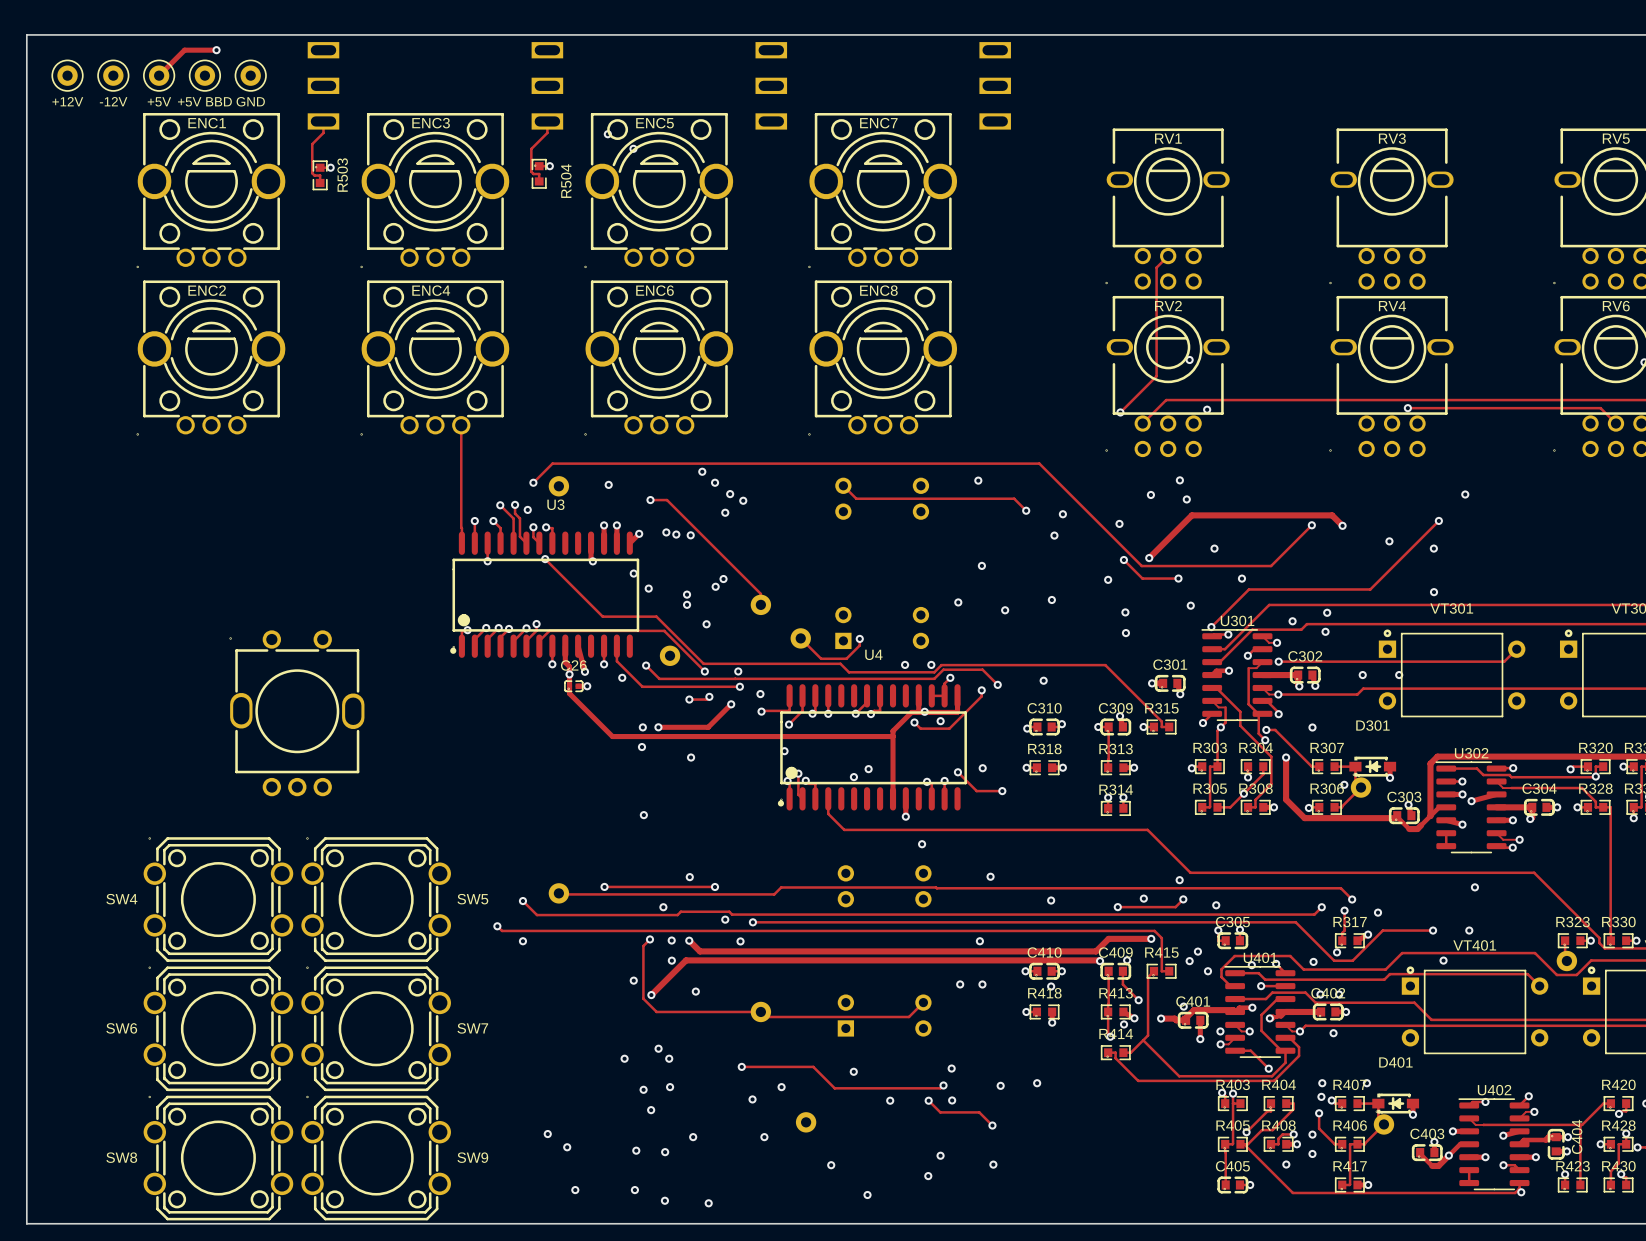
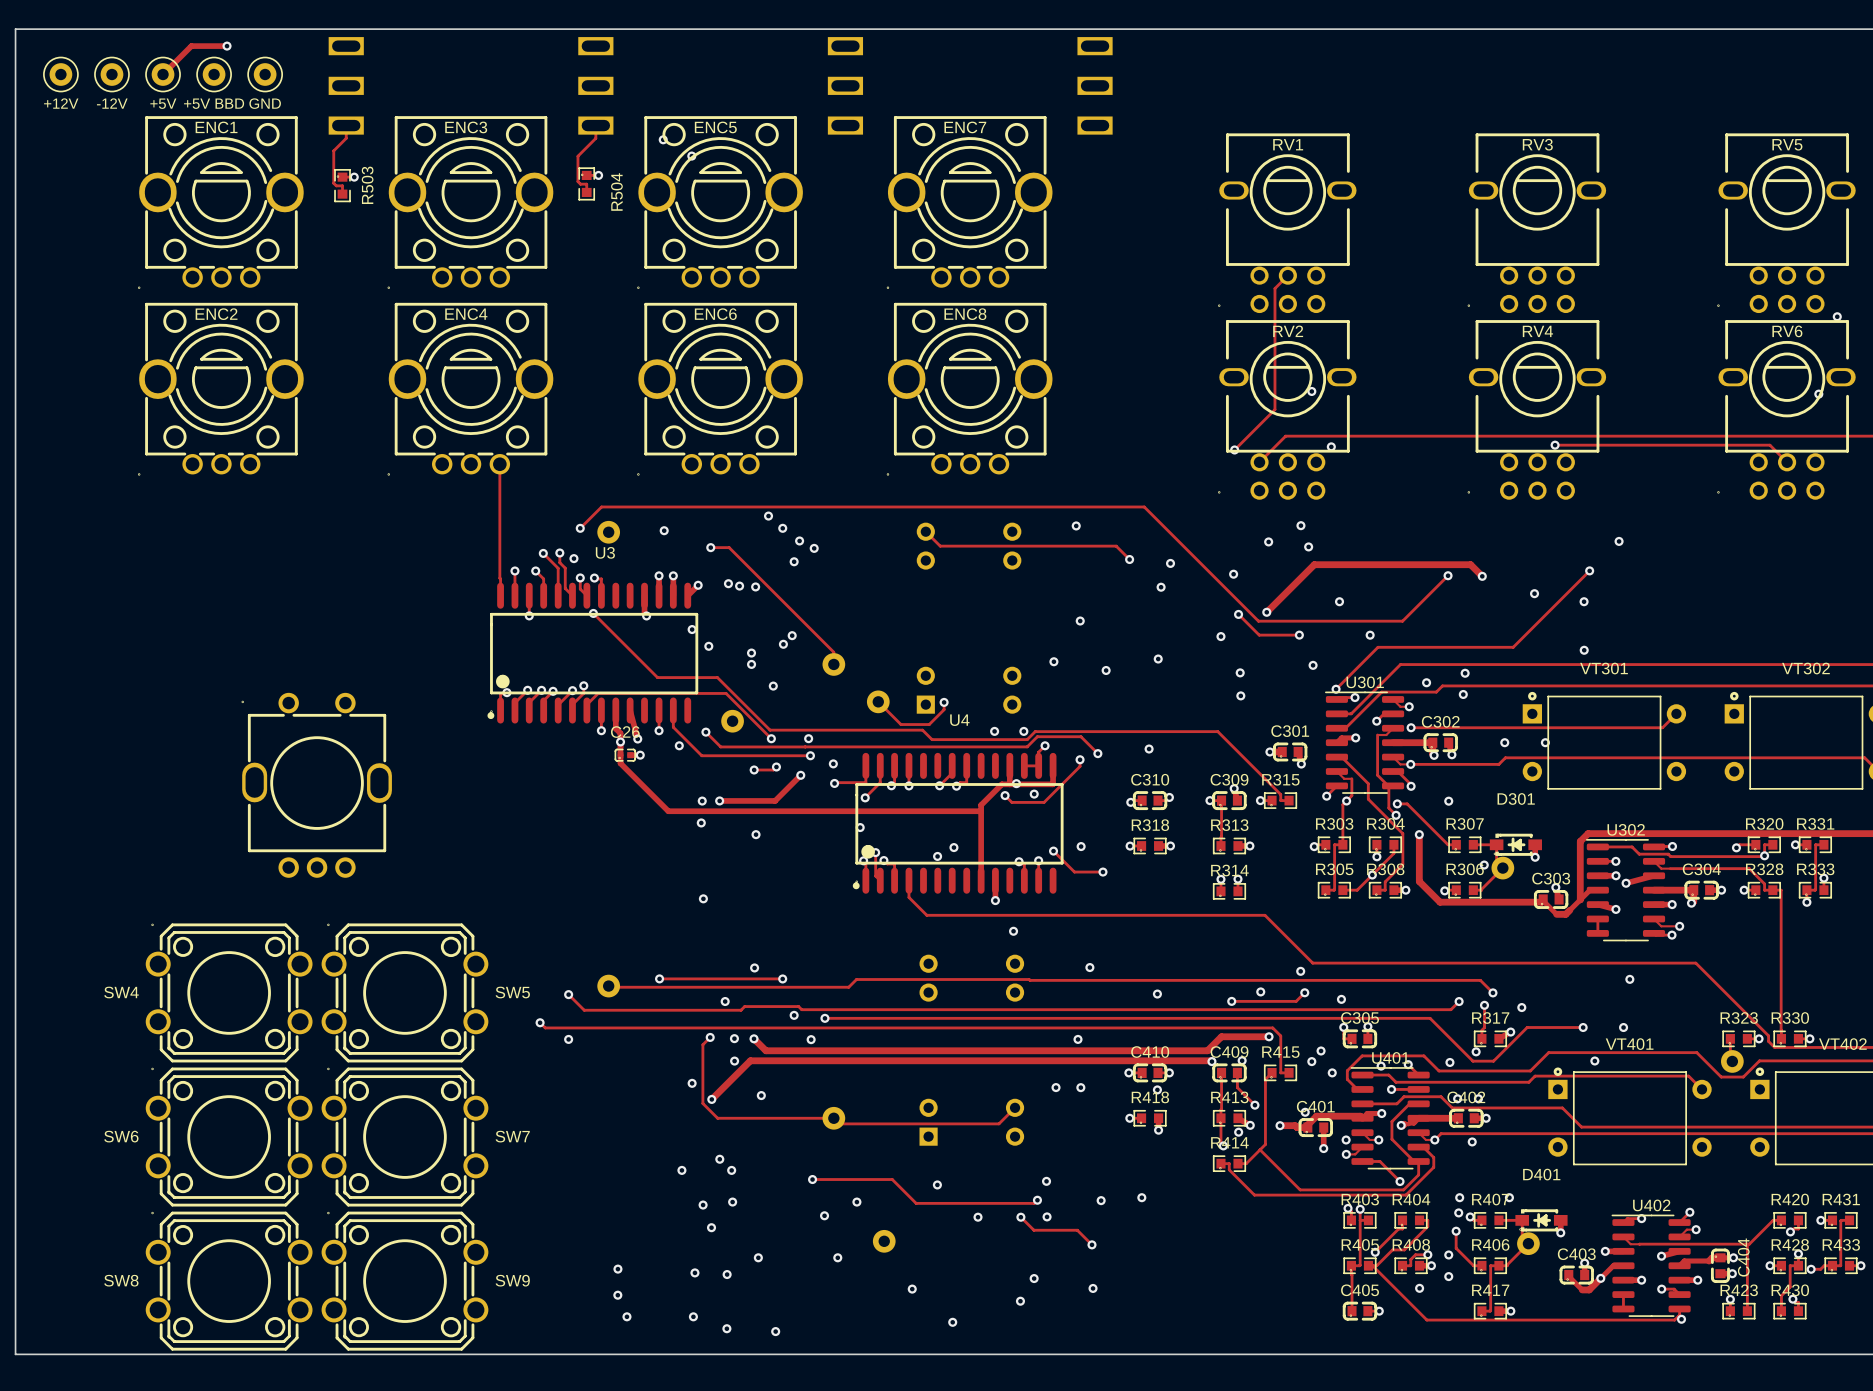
via position: (547, 1134) -> (617, 1295)

